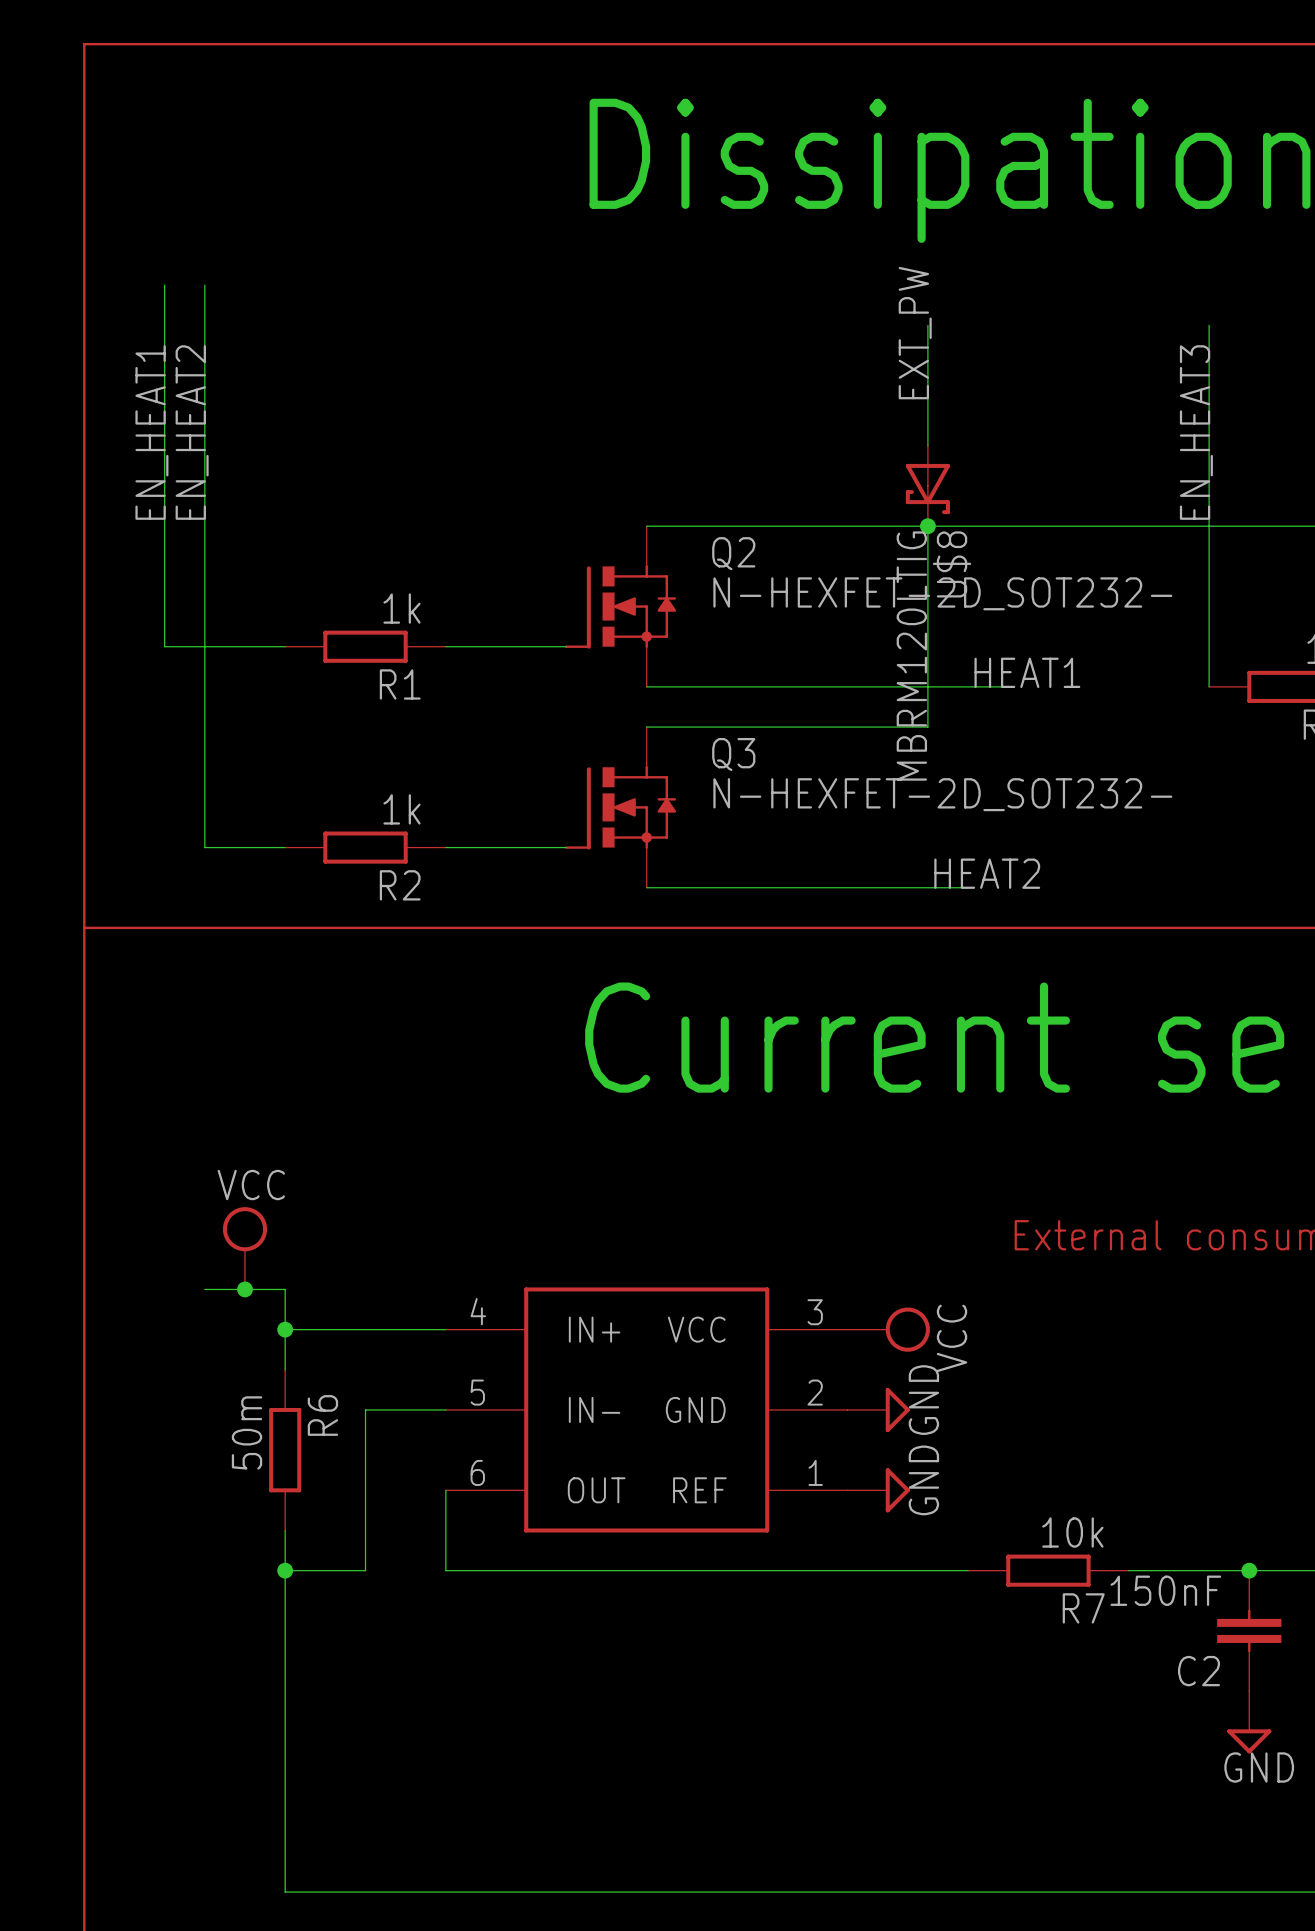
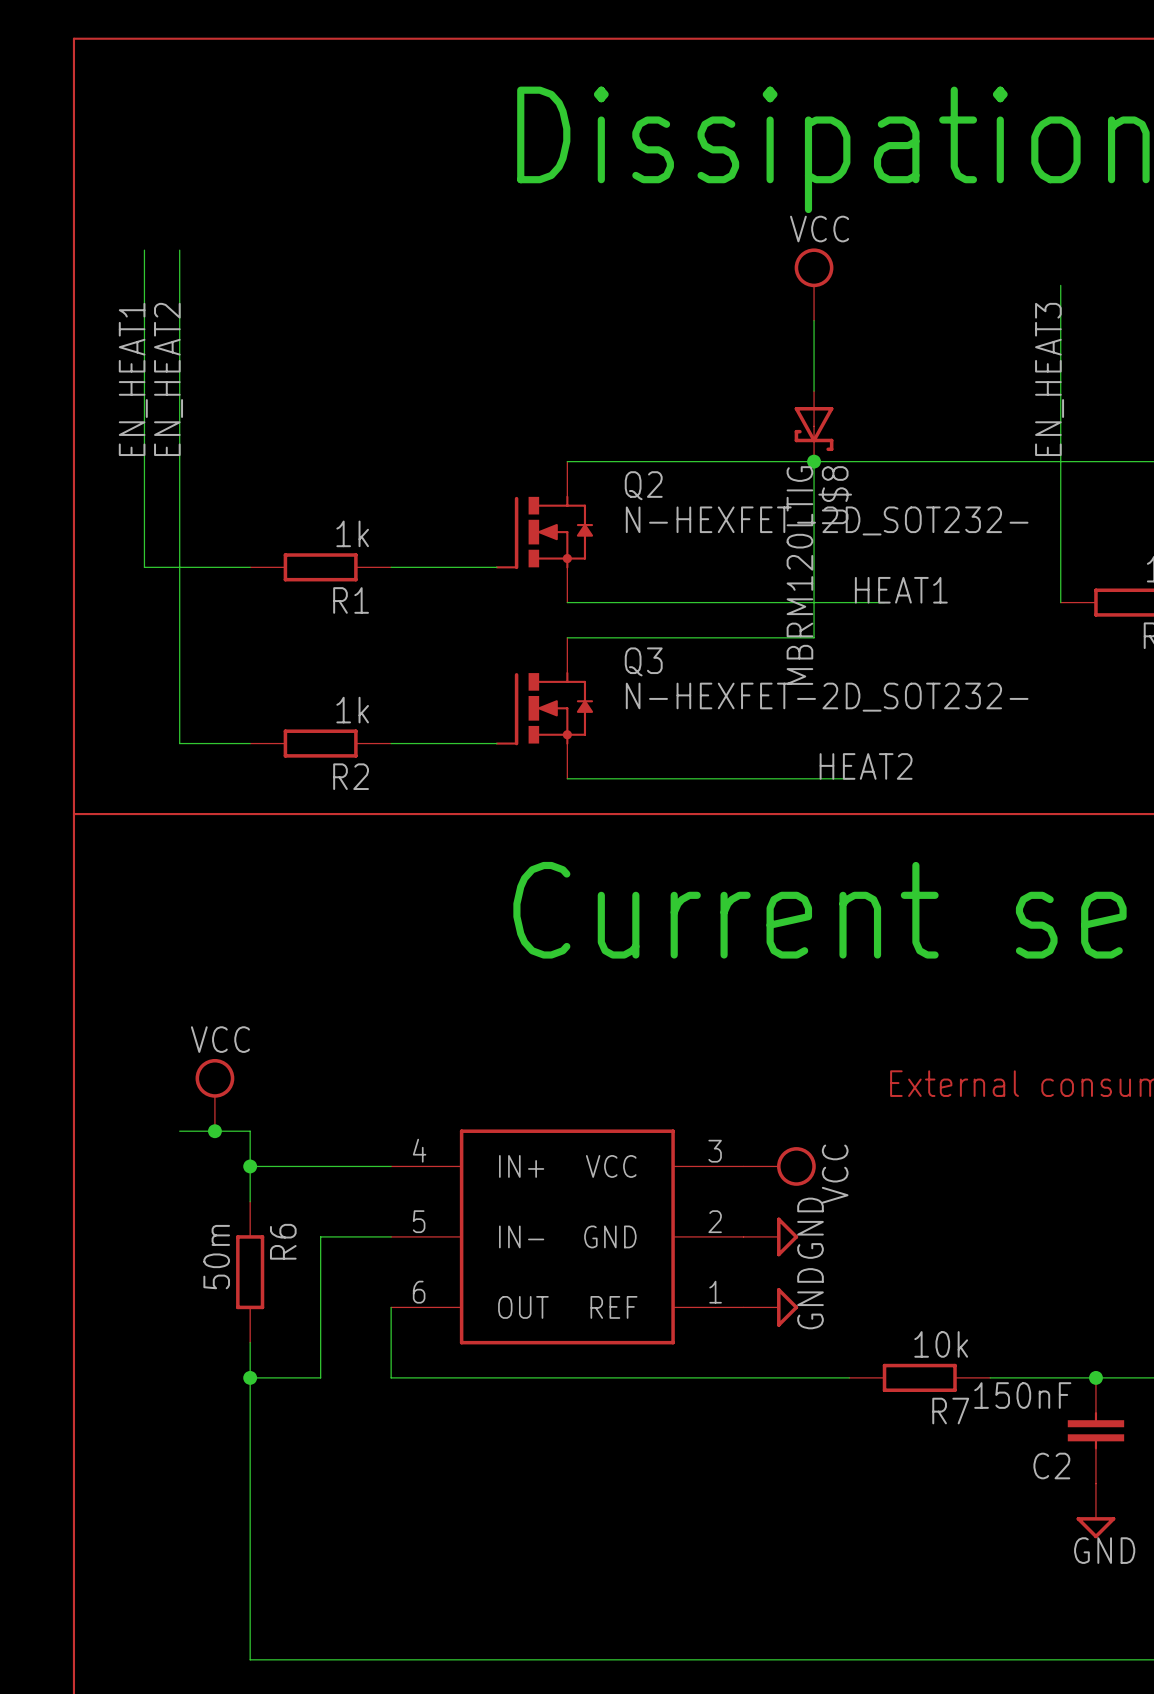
power symbol: none -> VCC (814, 284)
label: EXT_PW (915, 333) -> none

